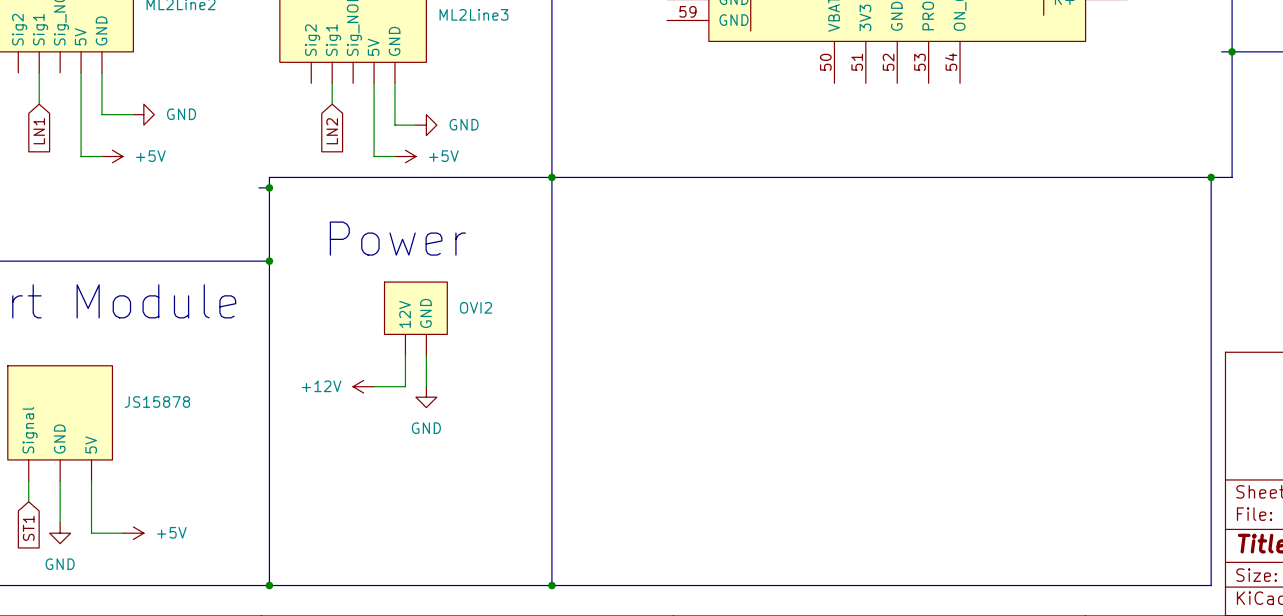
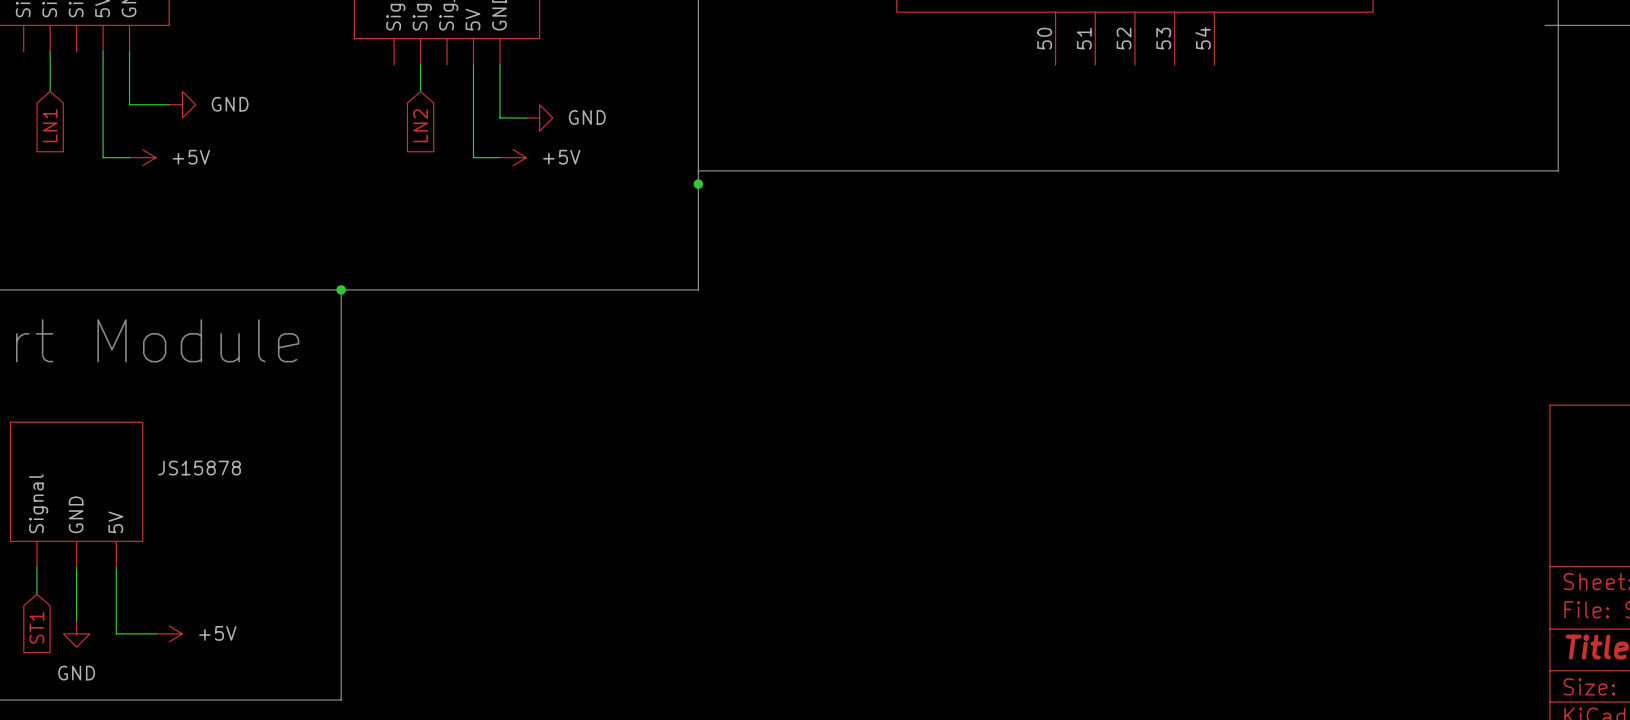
junction: (1232, 51) -> none
bus: (1232, 166) (1232, 177) (269, 177) (269, 261) -> (1558, 170) (698, 170)
bus: (1211, 177) (1211, 585) (269, 585) -> none
junction: (1211, 177) -> none
bus: (258, 187) (269, 187) -> none
junction: (269, 187) -> none
text: Power (397, 238) -> none
bus: (551, 261) (551, 585) -> (698, 289) (341, 289)
OVI2: (415, 318) -> none
wire: (405, 355) (405, 386) (374, 386) -> none
wire: (426, 355) (426, 386) -> none
power symbol: +12V (363, 386) -> none
power symbol: GND (426, 397) -> none
junction: (269, 585) -> none
junction: (551, 585) -> none

